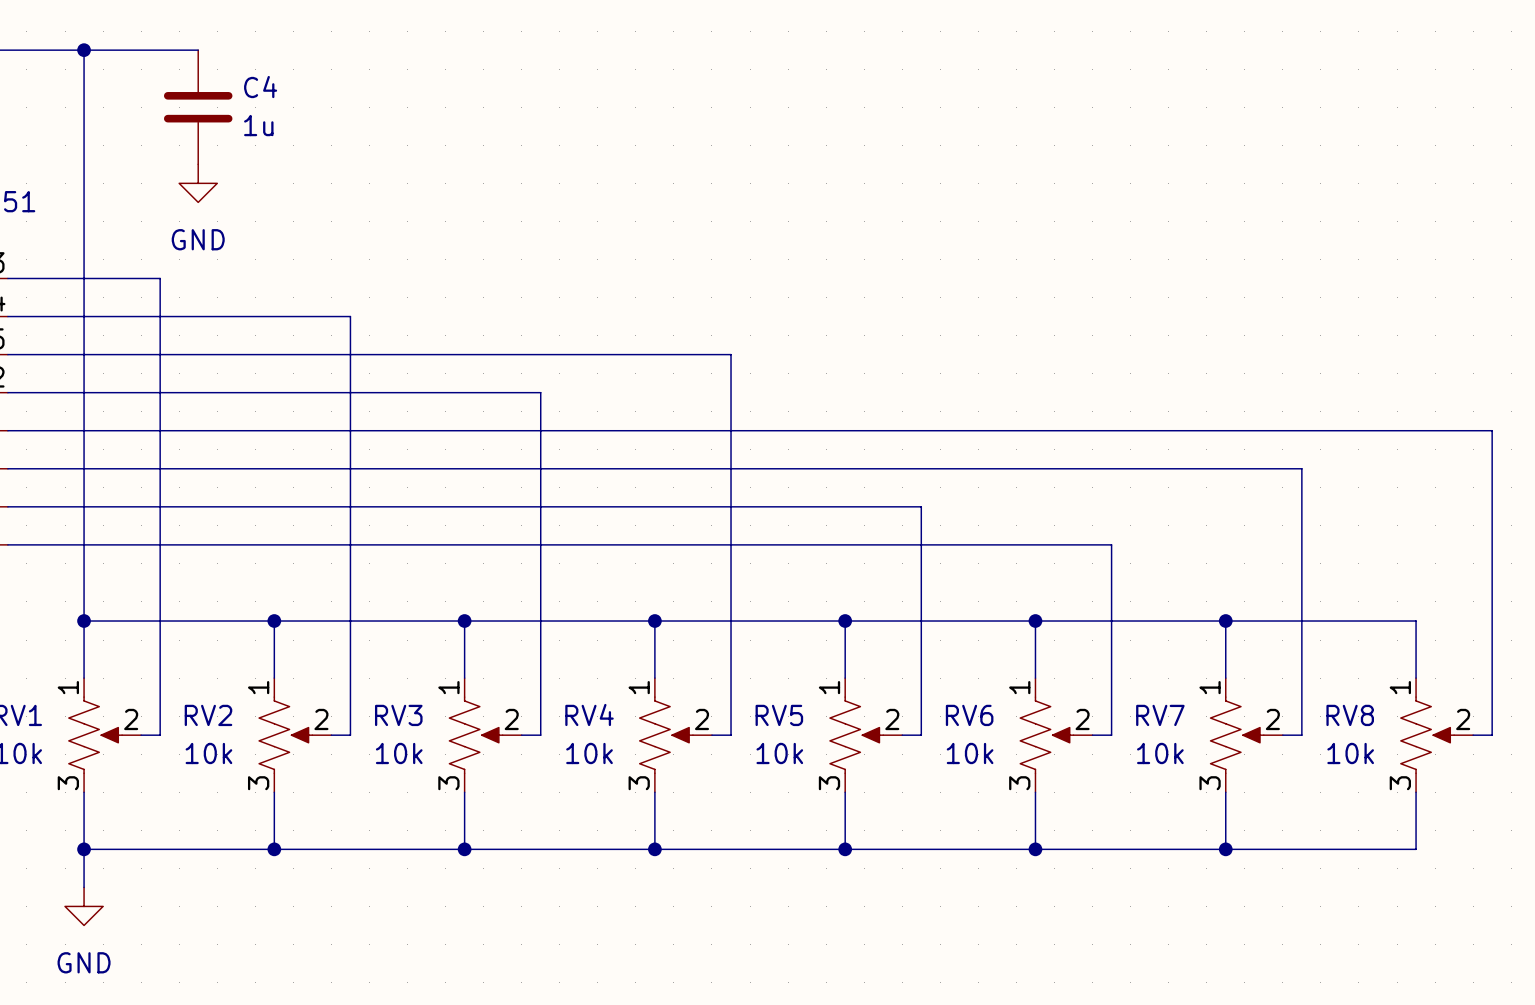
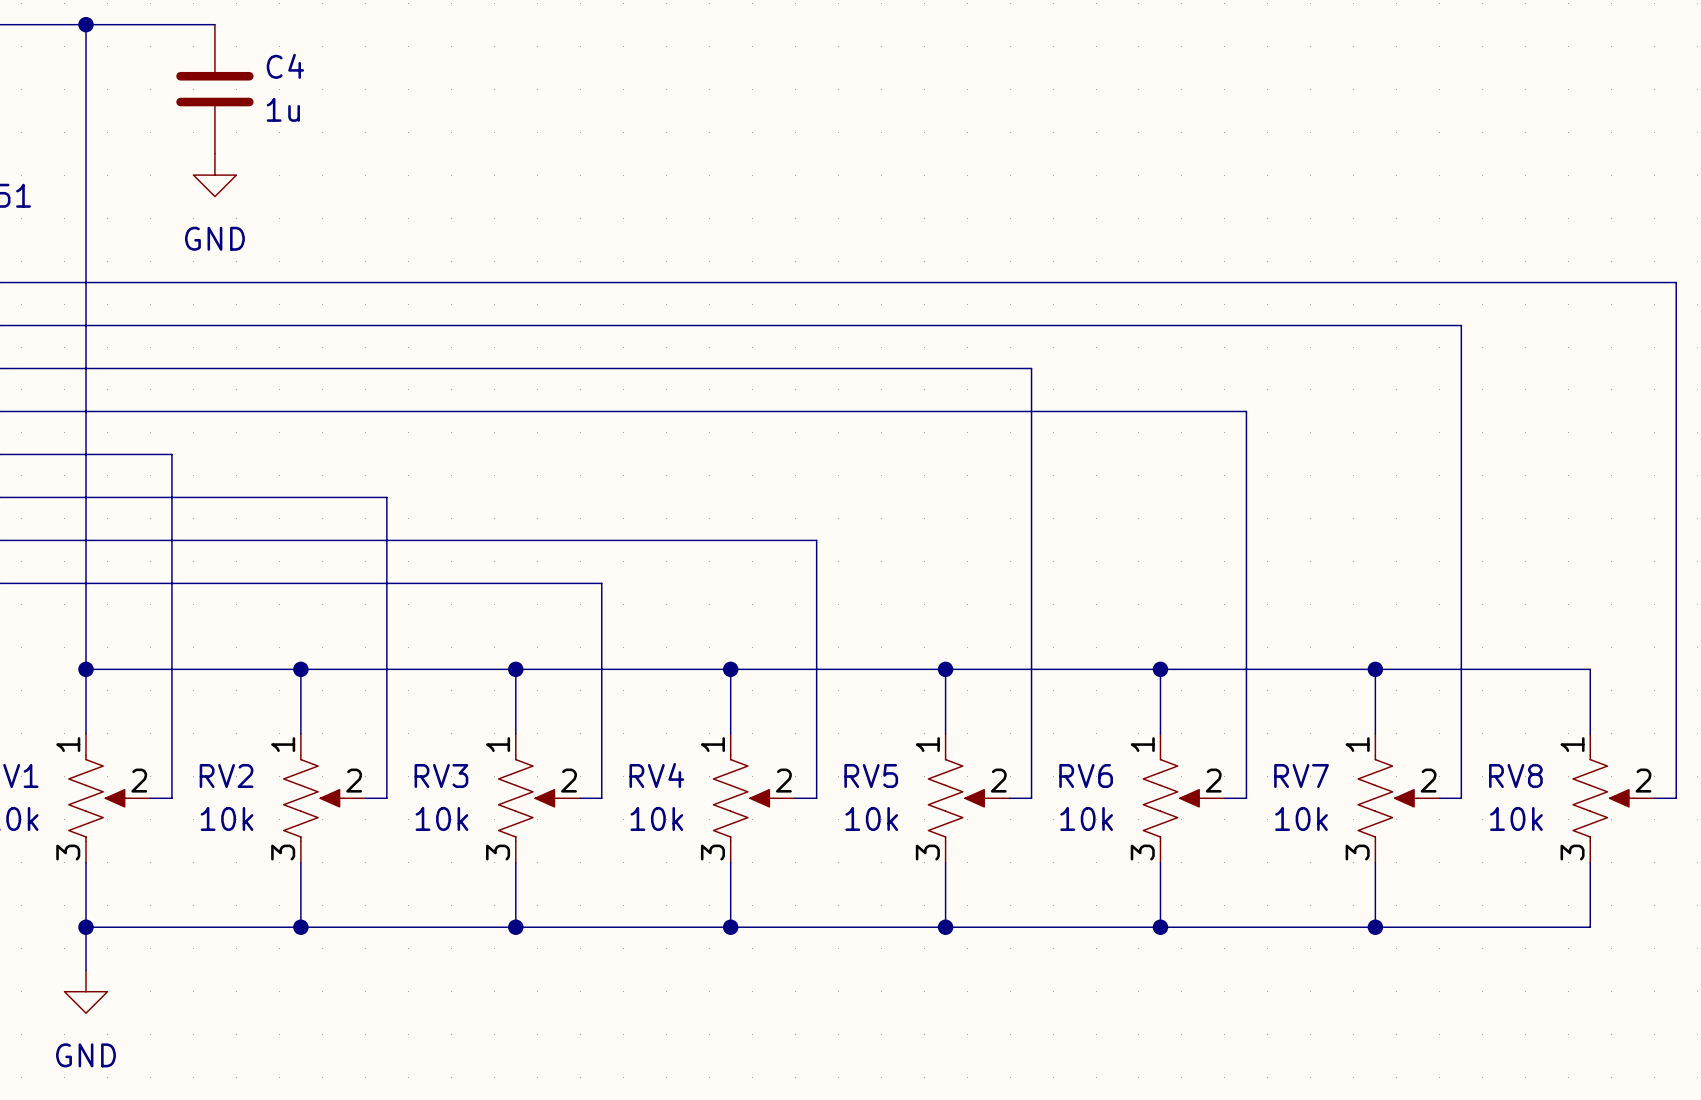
wire: (160, 278) (160, 430) (1492, 430) -> (171, 282) (1676, 282) (1676, 454)
wire: (350, 316) (350, 468) (1301, 468) -> (386, 325) (1461, 325) (1461, 497)
wire: (731, 354) (731, 506) (921, 506) -> (816, 368) (1031, 368) (1031, 540)
wire: (540, 392) (540, 544) (1111, 544) -> (601, 411) (1246, 411) (1246, 583)

